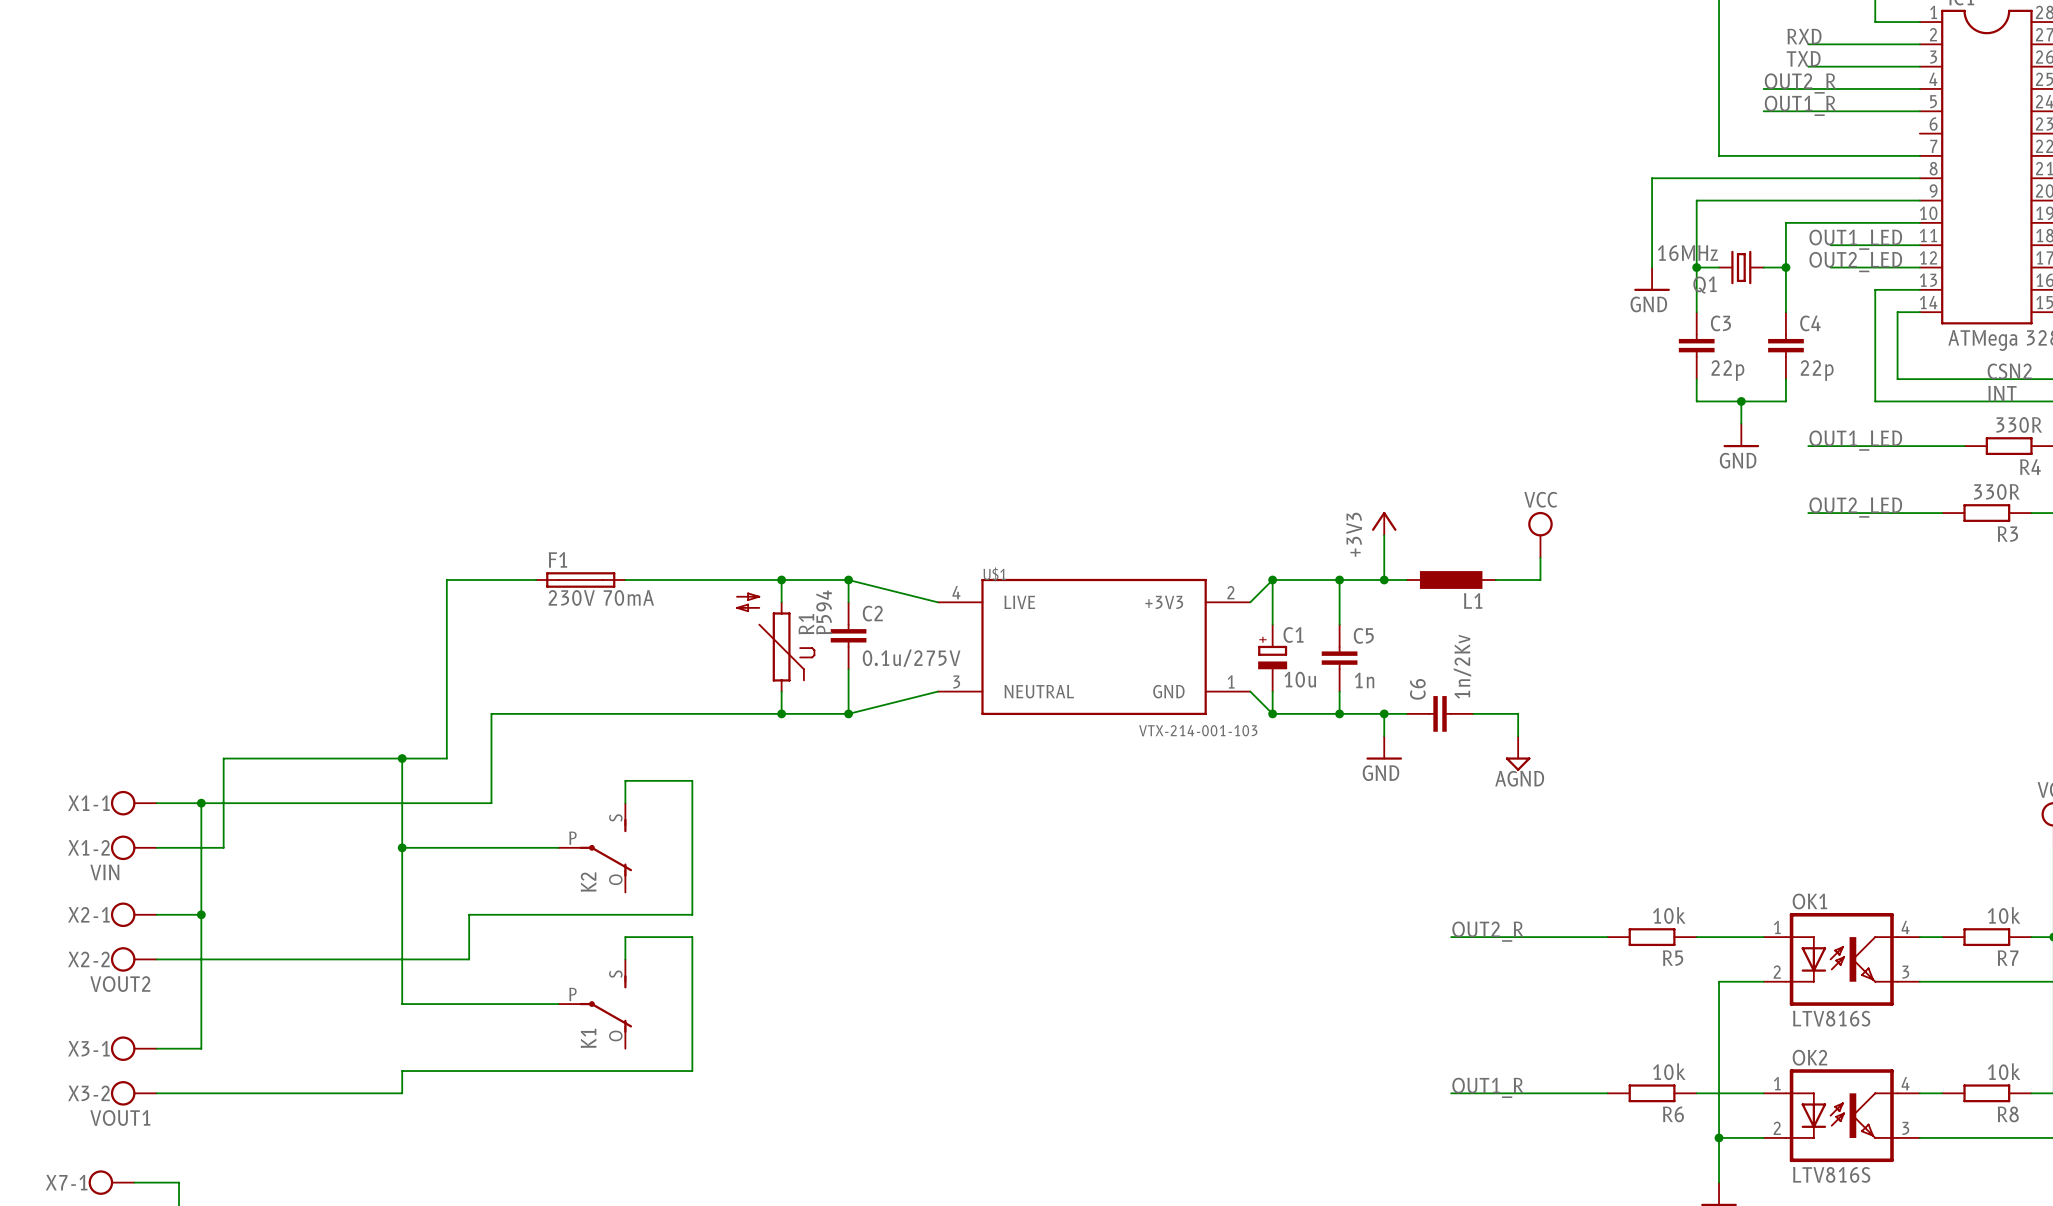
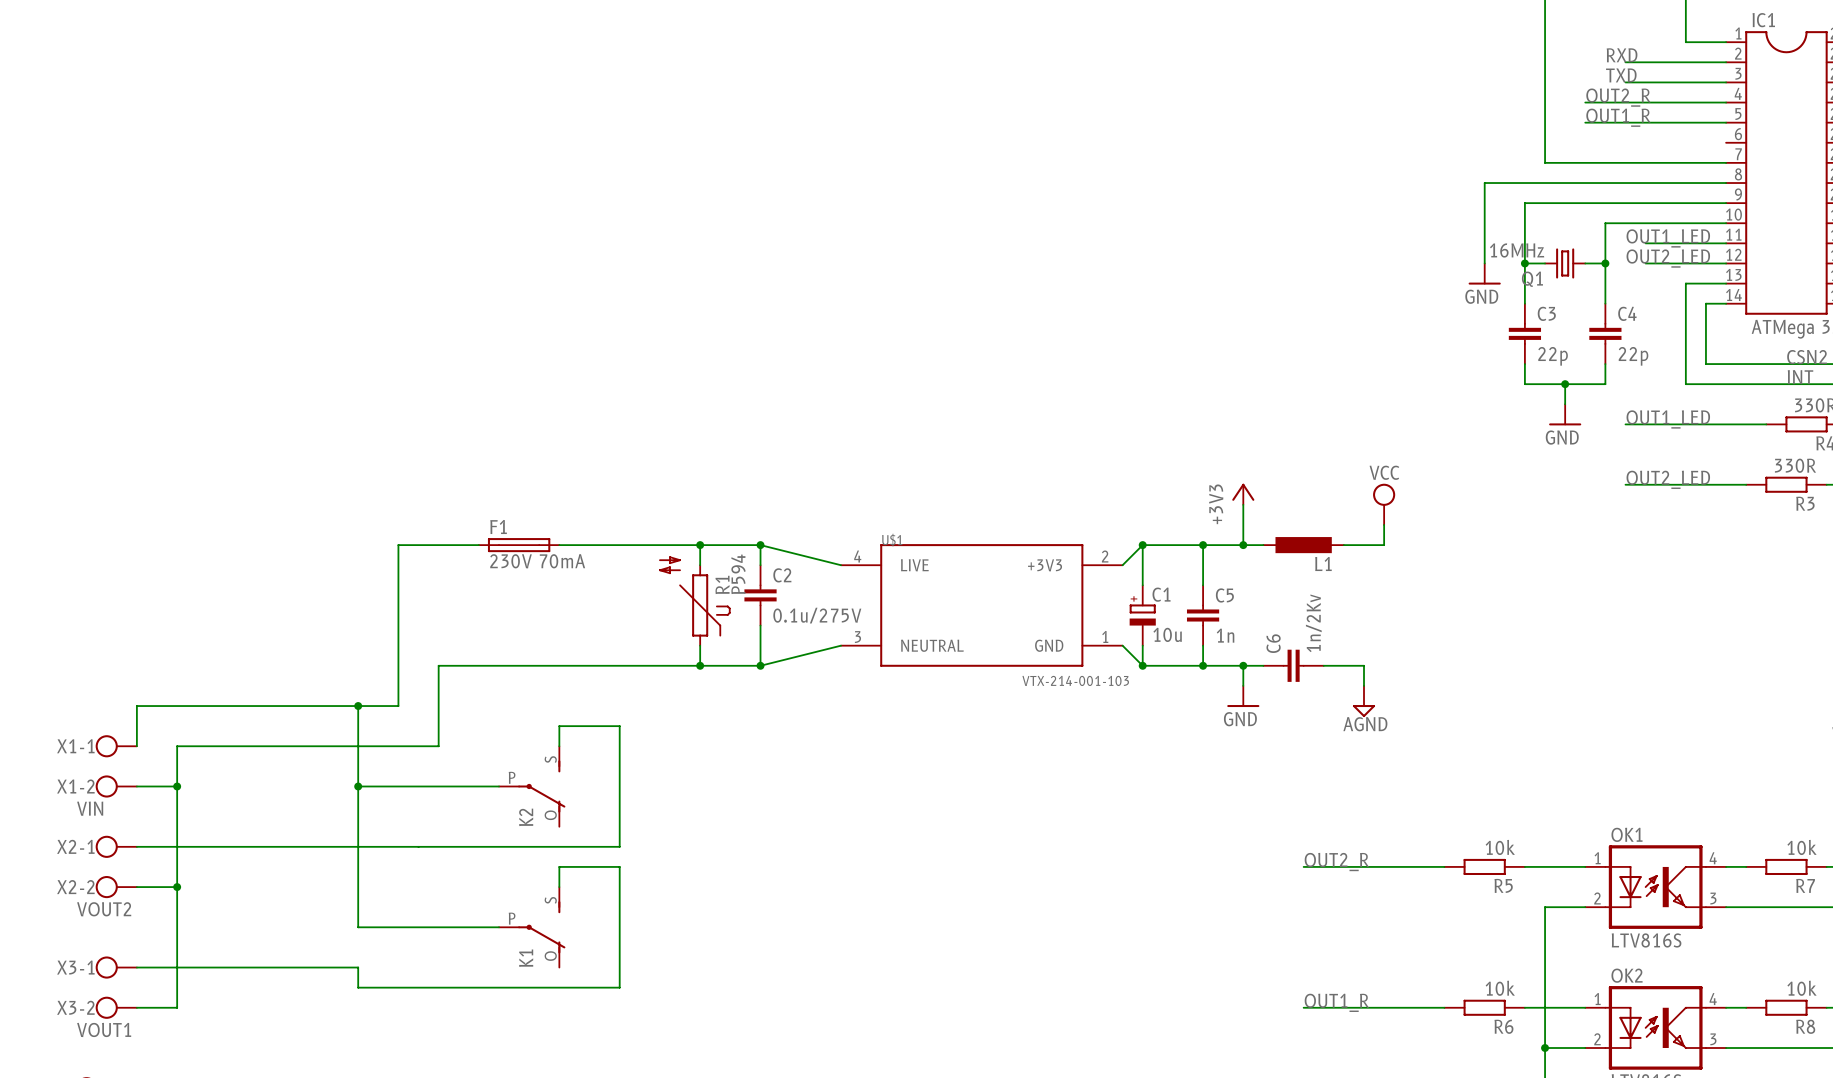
wire: (223, 758) (223, 847) (201, 847) -> none
wire: (156, 803) (201, 803) -> (136, 746) (136, 706) (197, 706)
junction: (201, 803) -> none
junction: none -> (177, 786)
junction: (201, 914) -> none
wire: (469, 914) (469, 959) (201, 959) -> (418, 846) (177, 846)
junction: none -> (177, 887)
wire: (402, 1071) (402, 1093) (201, 1093) -> (358, 987) (358, 967) (177, 967) (177, 1007)

